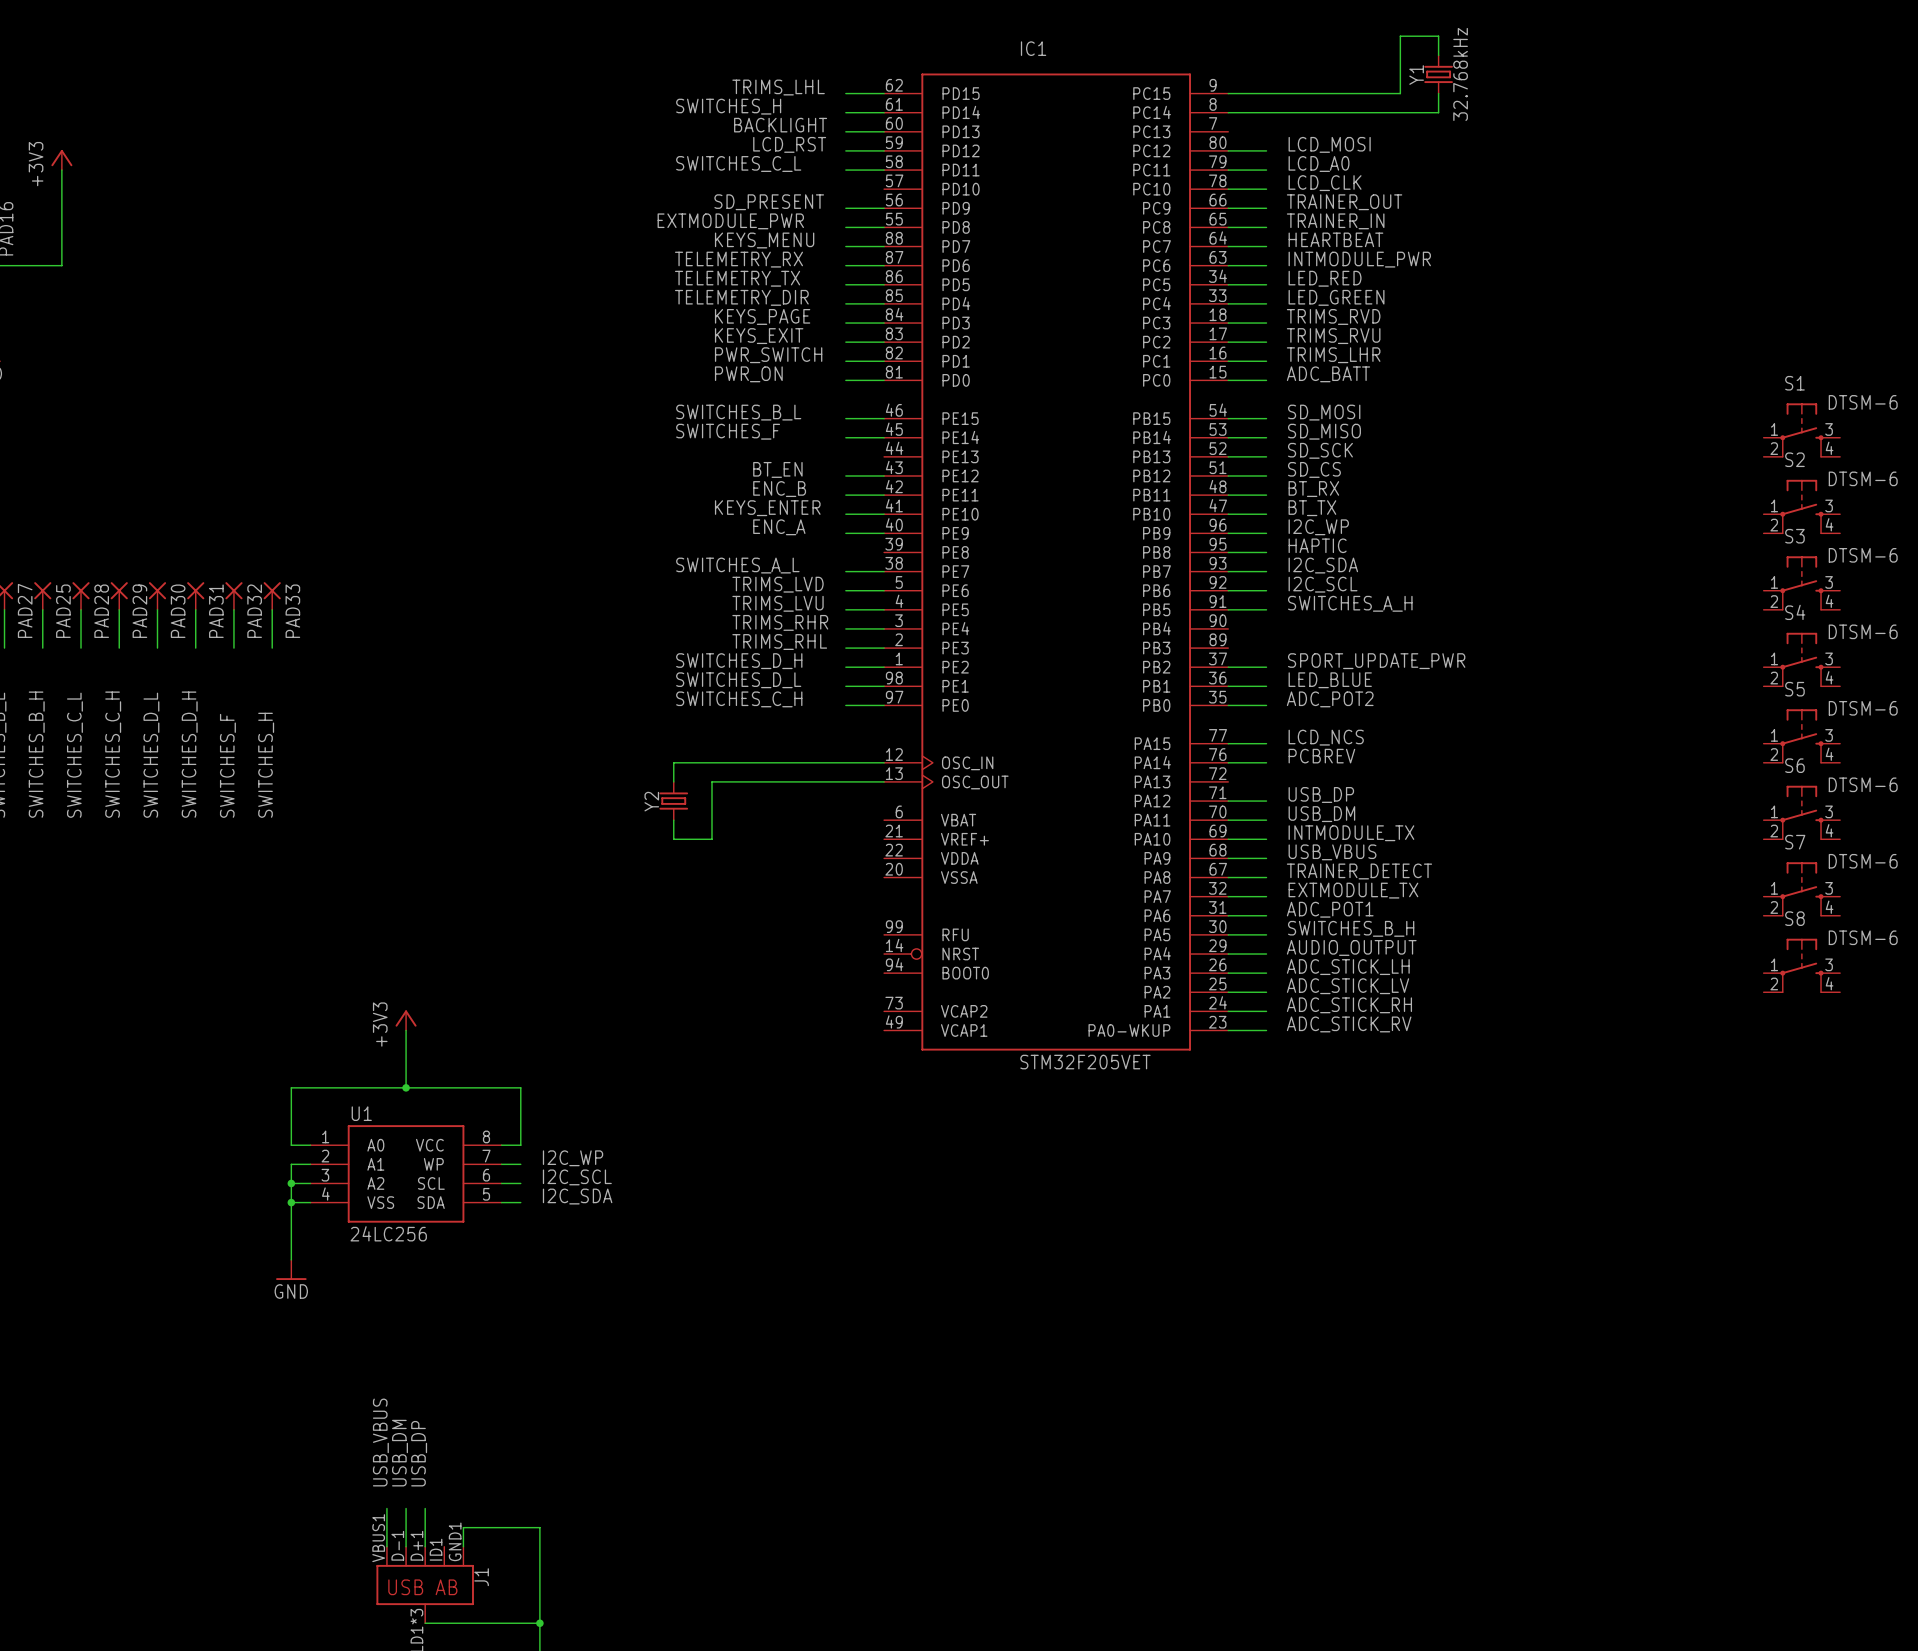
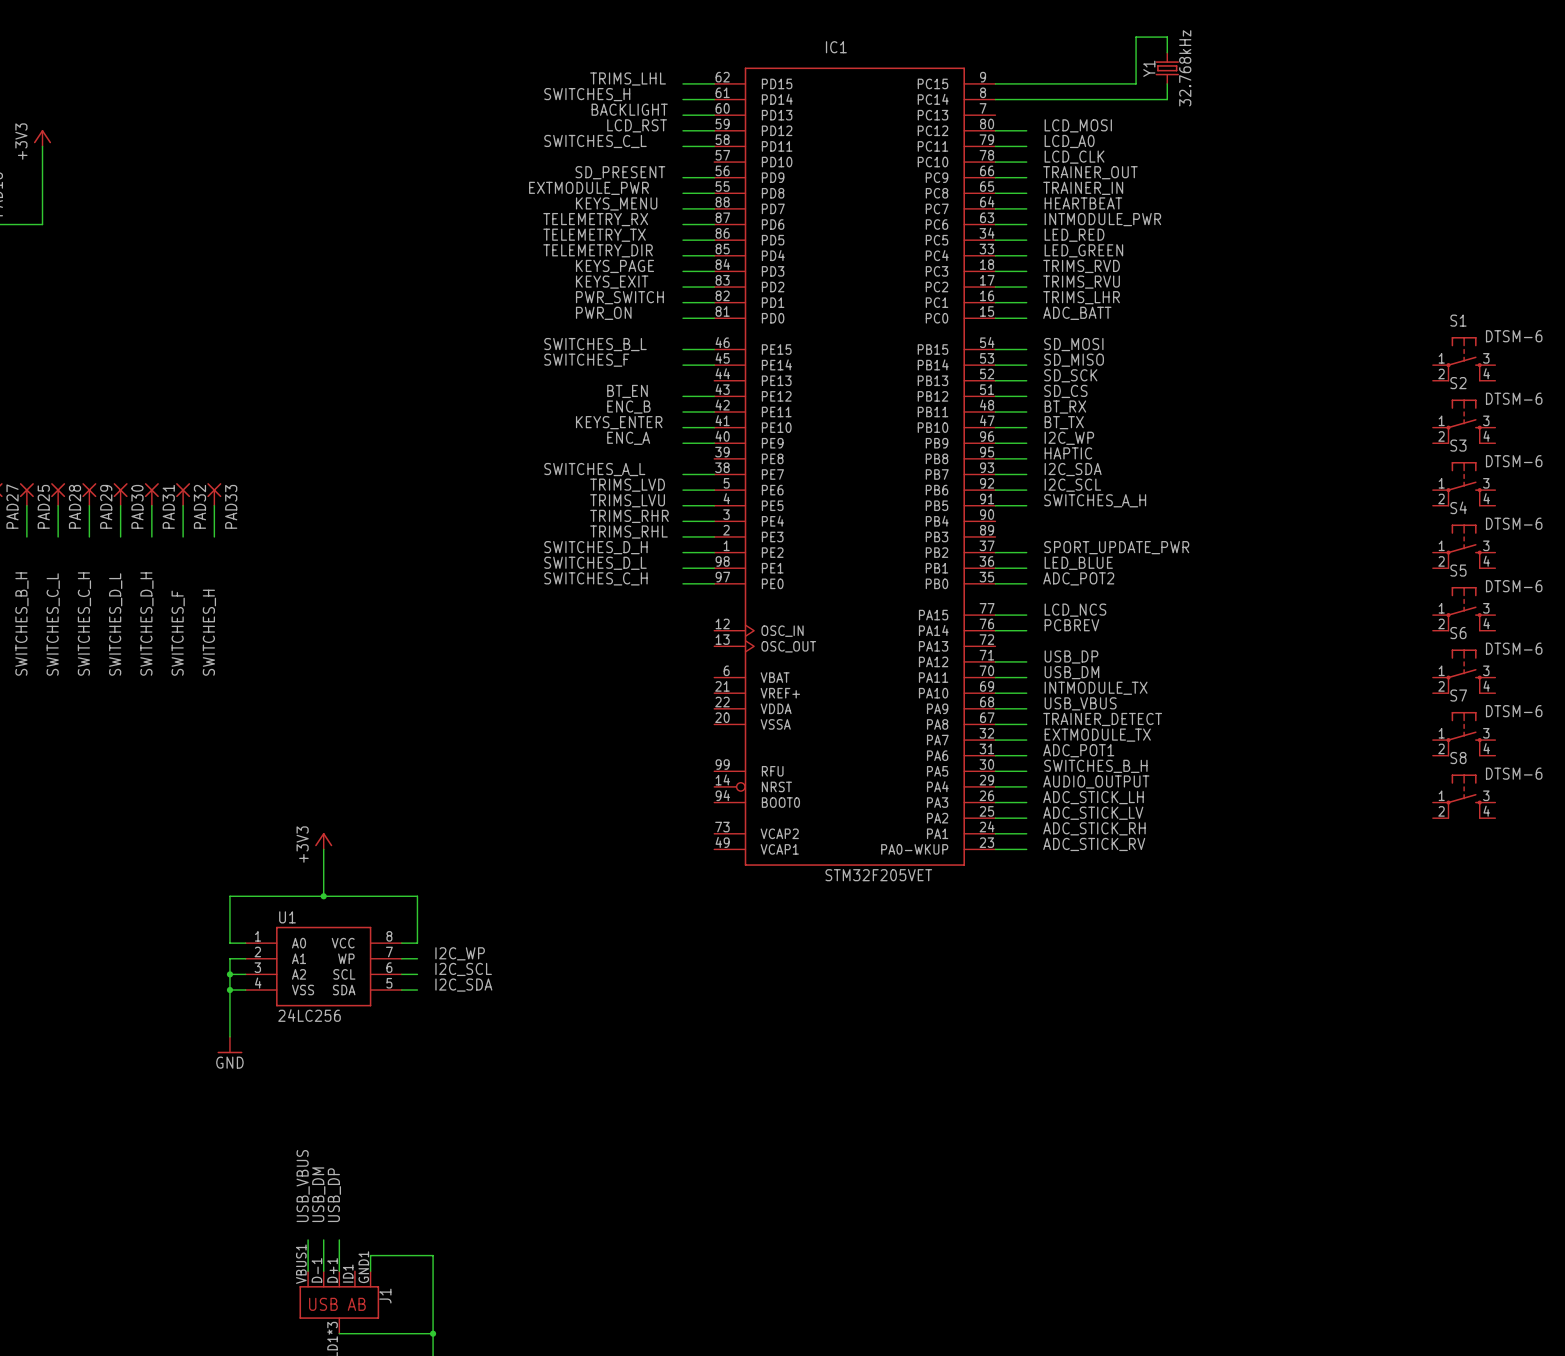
wire: (884, 762) (673, 762) (673, 781) -> none
wire: (884, 781) (711, 781) (711, 839) (673, 839) (673, 820) -> none
Y2: (673, 801) -> none

